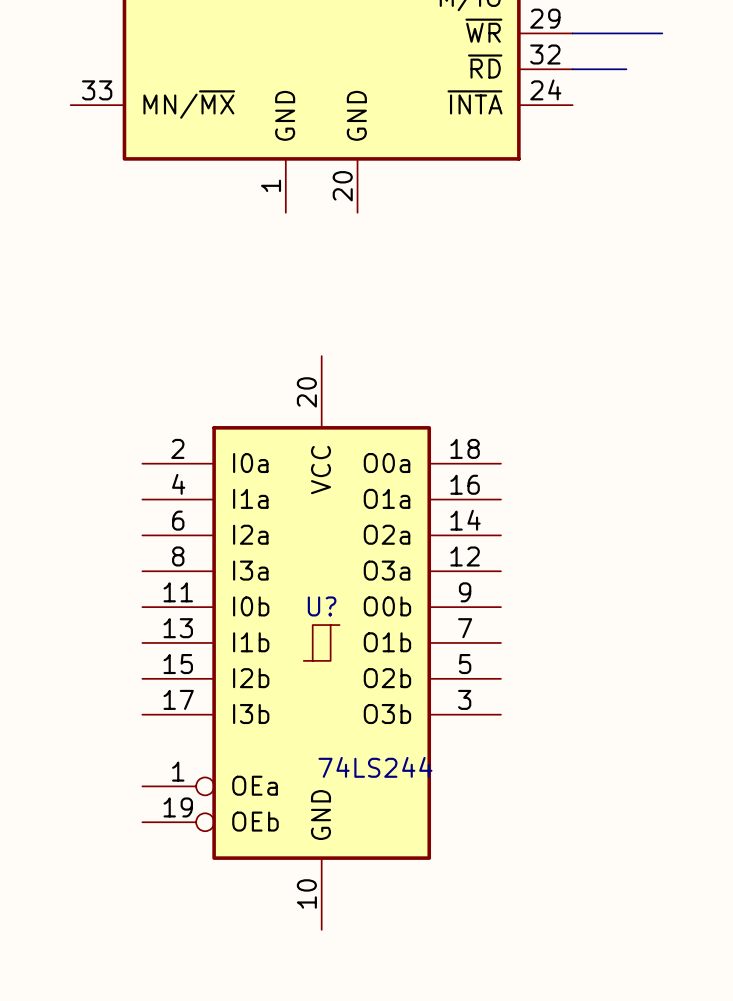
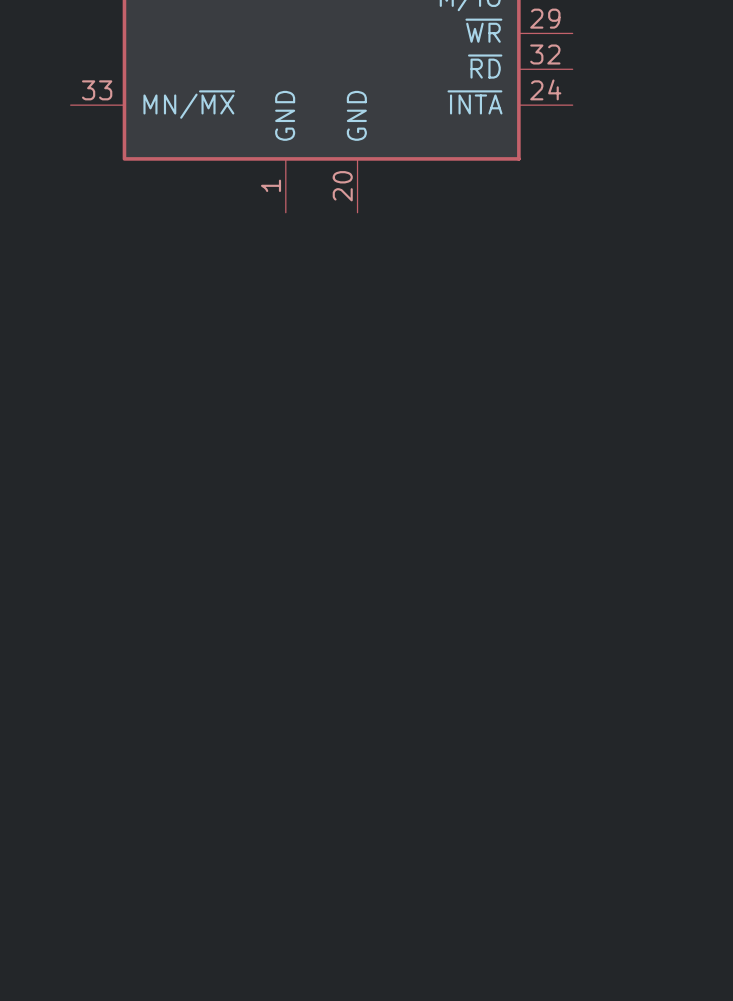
wire: (572, 33) (662, 33) -> none
wire: (572, 69) (626, 69) -> none
U?: 74LS244 (321, 642) -> none

